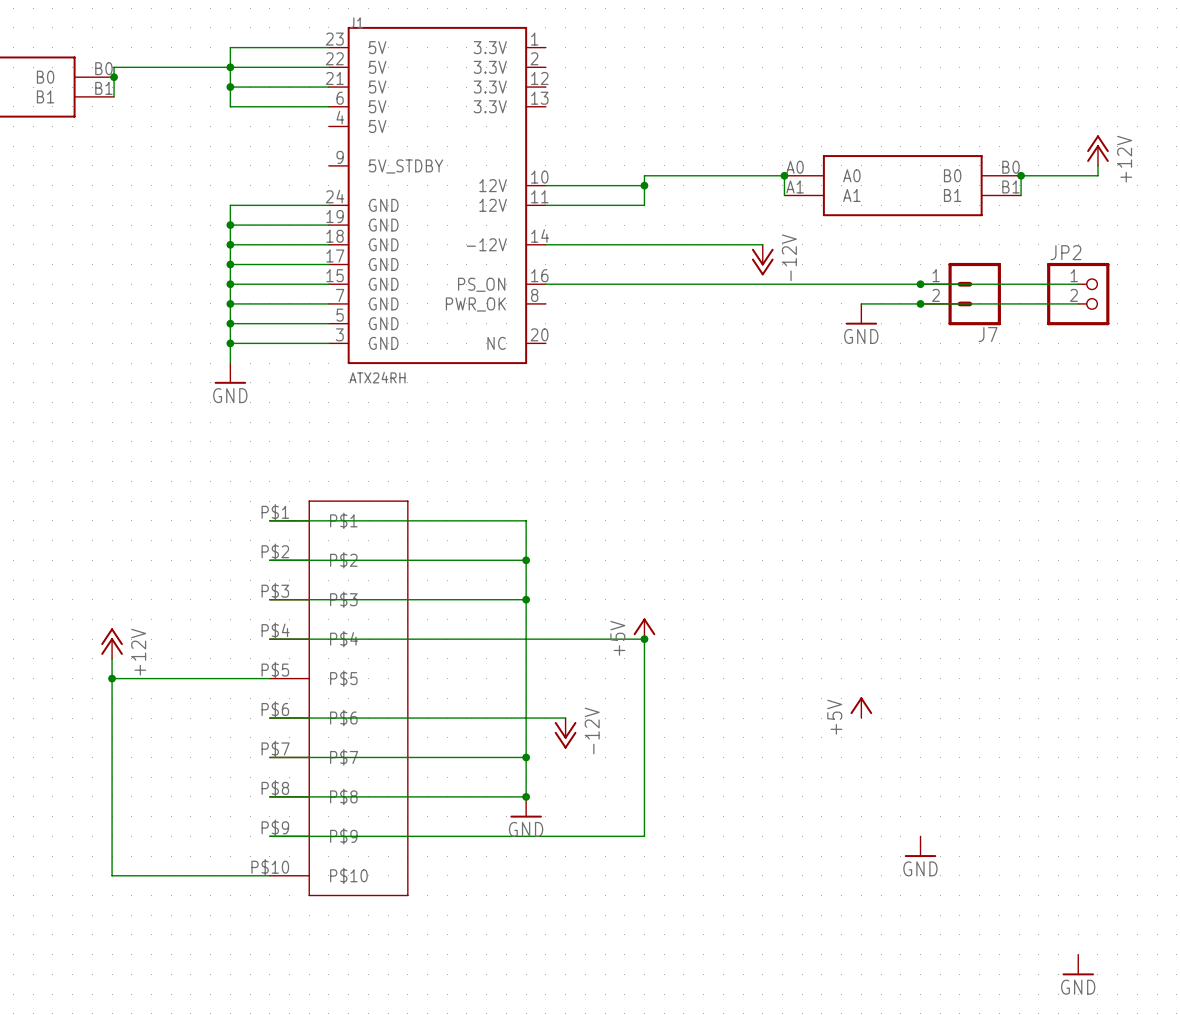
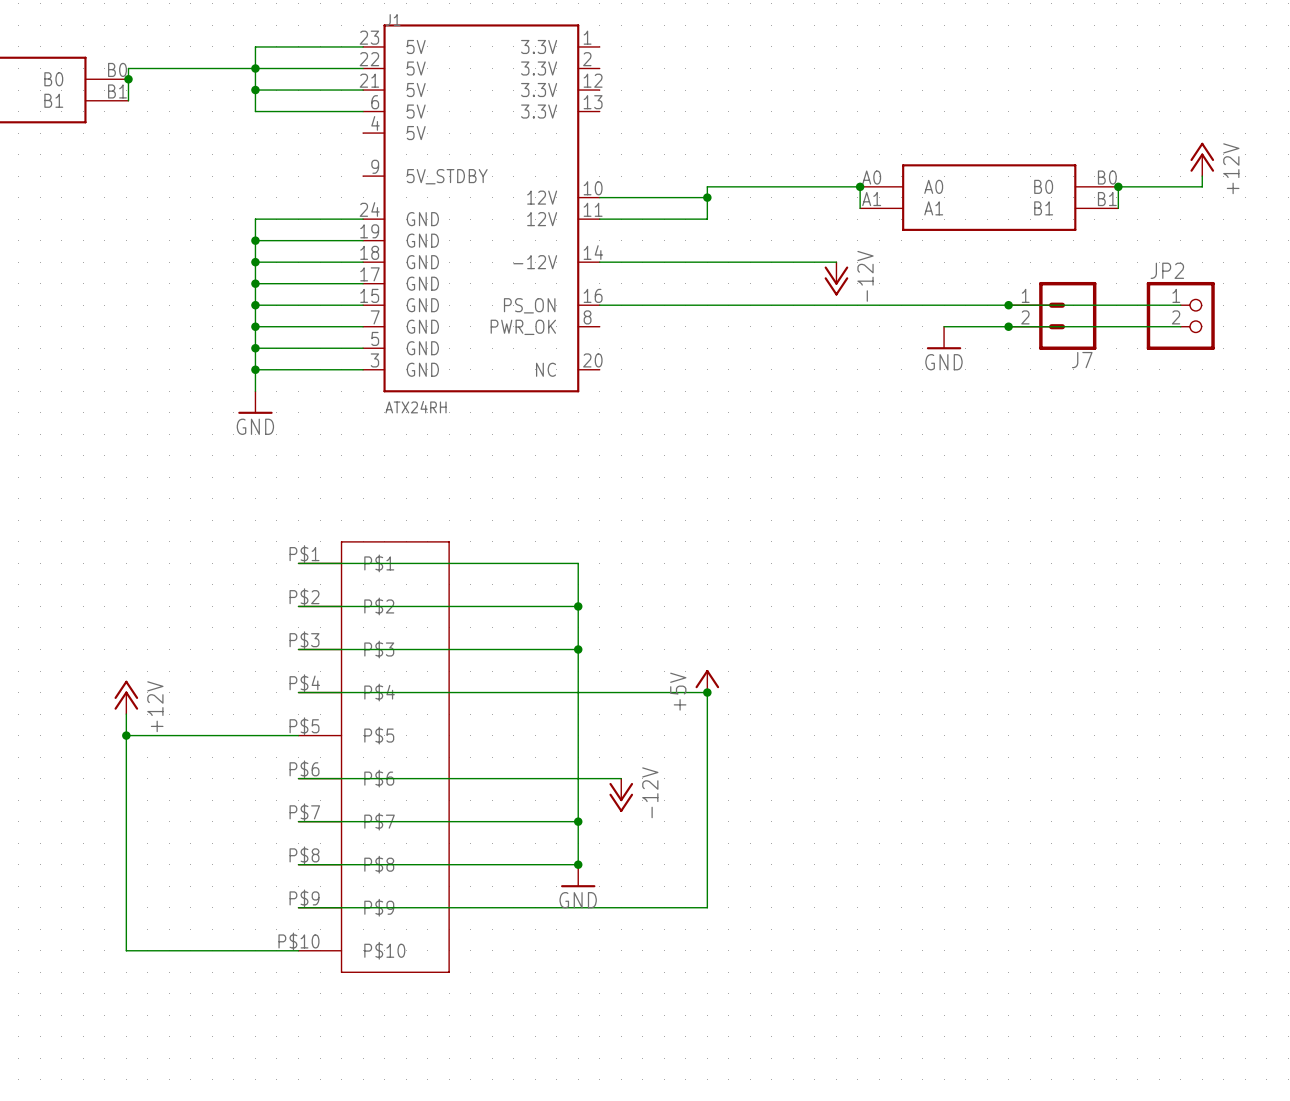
power symbol: +5V (861, 707) -> none
power symbol: GND (920, 846) -> none
power symbol: GND (1078, 965) -> none

